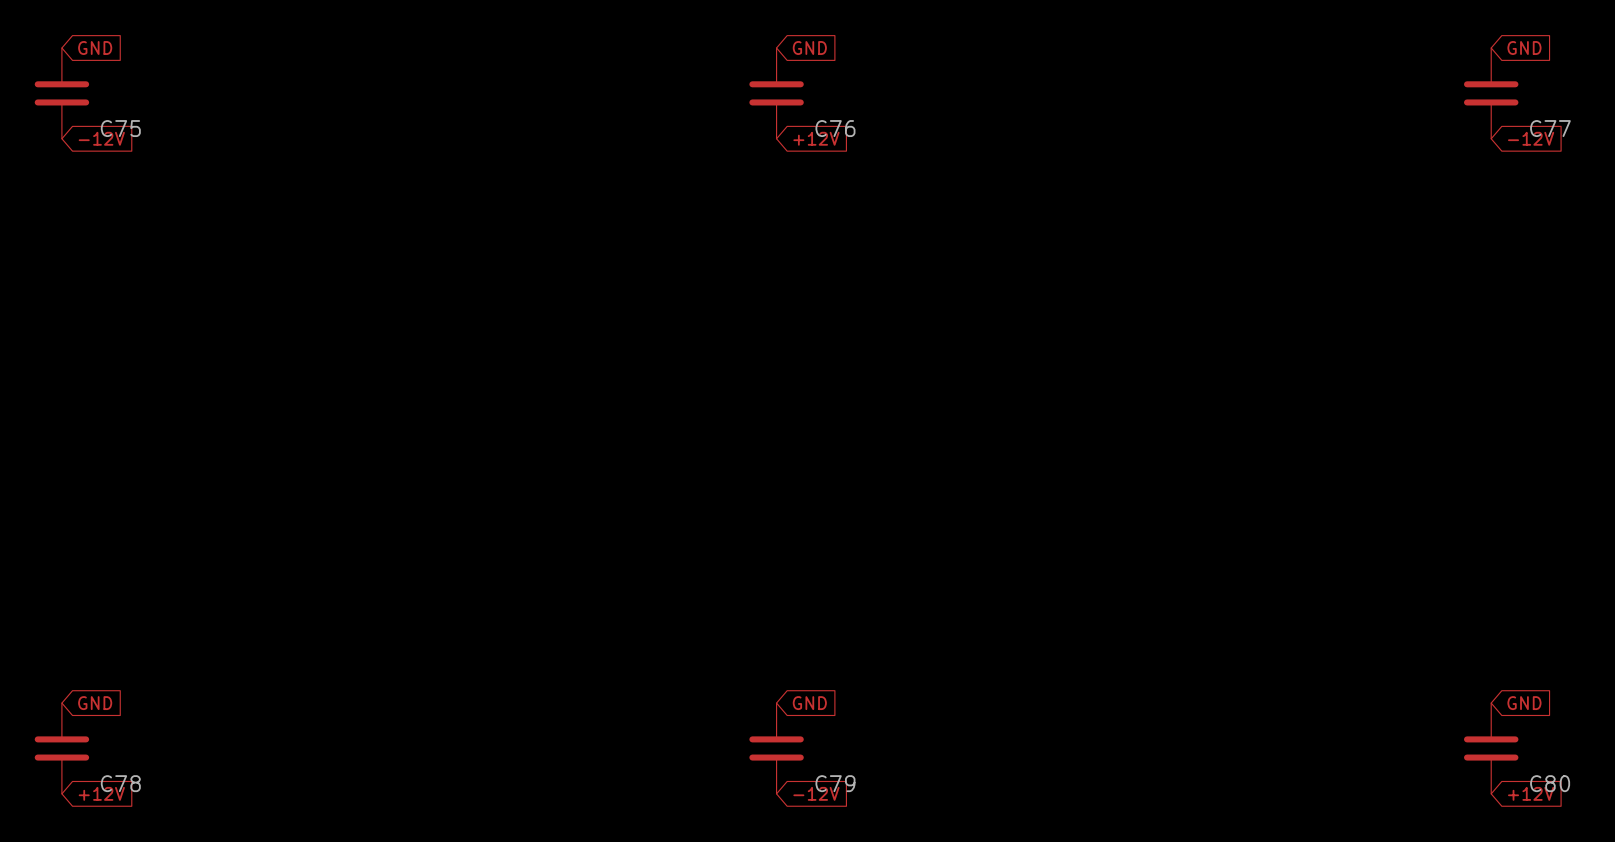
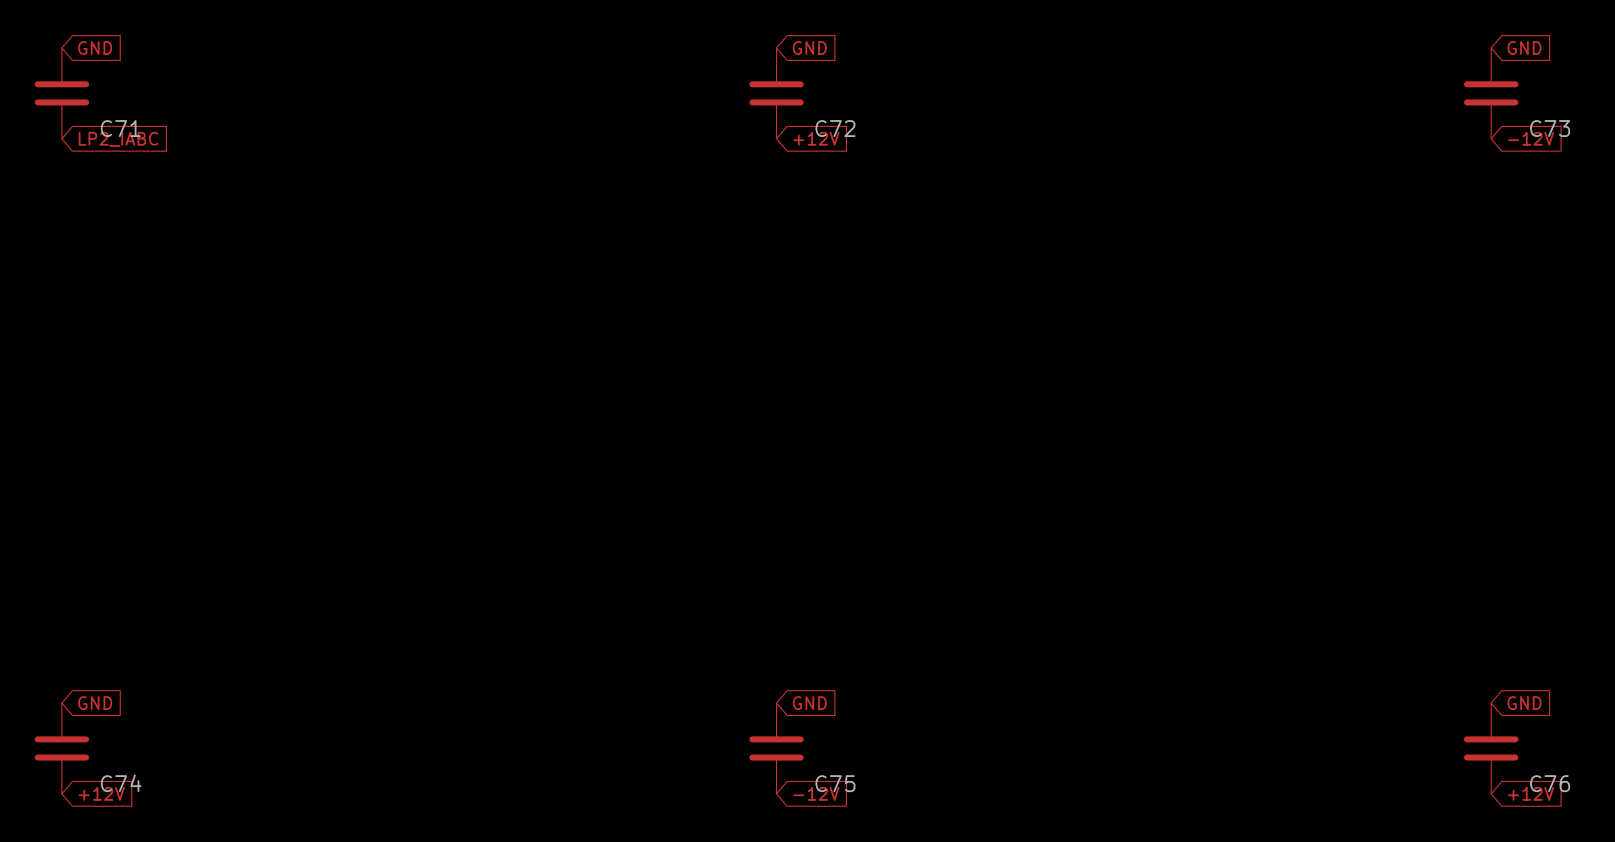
C75 name: C75 (120, 128) -> C71 (120, 128)
C76 name: C76 (835, 128) -> C72 (835, 128)
C77 name: C77 (1550, 128) -> C73 (1550, 128)
global label: -12V (101, 138) -> LP2_IABC (118, 139)
C78 name: C78 (120, 783) -> C74 (121, 783)
C79 name: C79 (835, 783) -> C75 (835, 783)
C80 name: C80 (1550, 783) -> C76 (1550, 783)

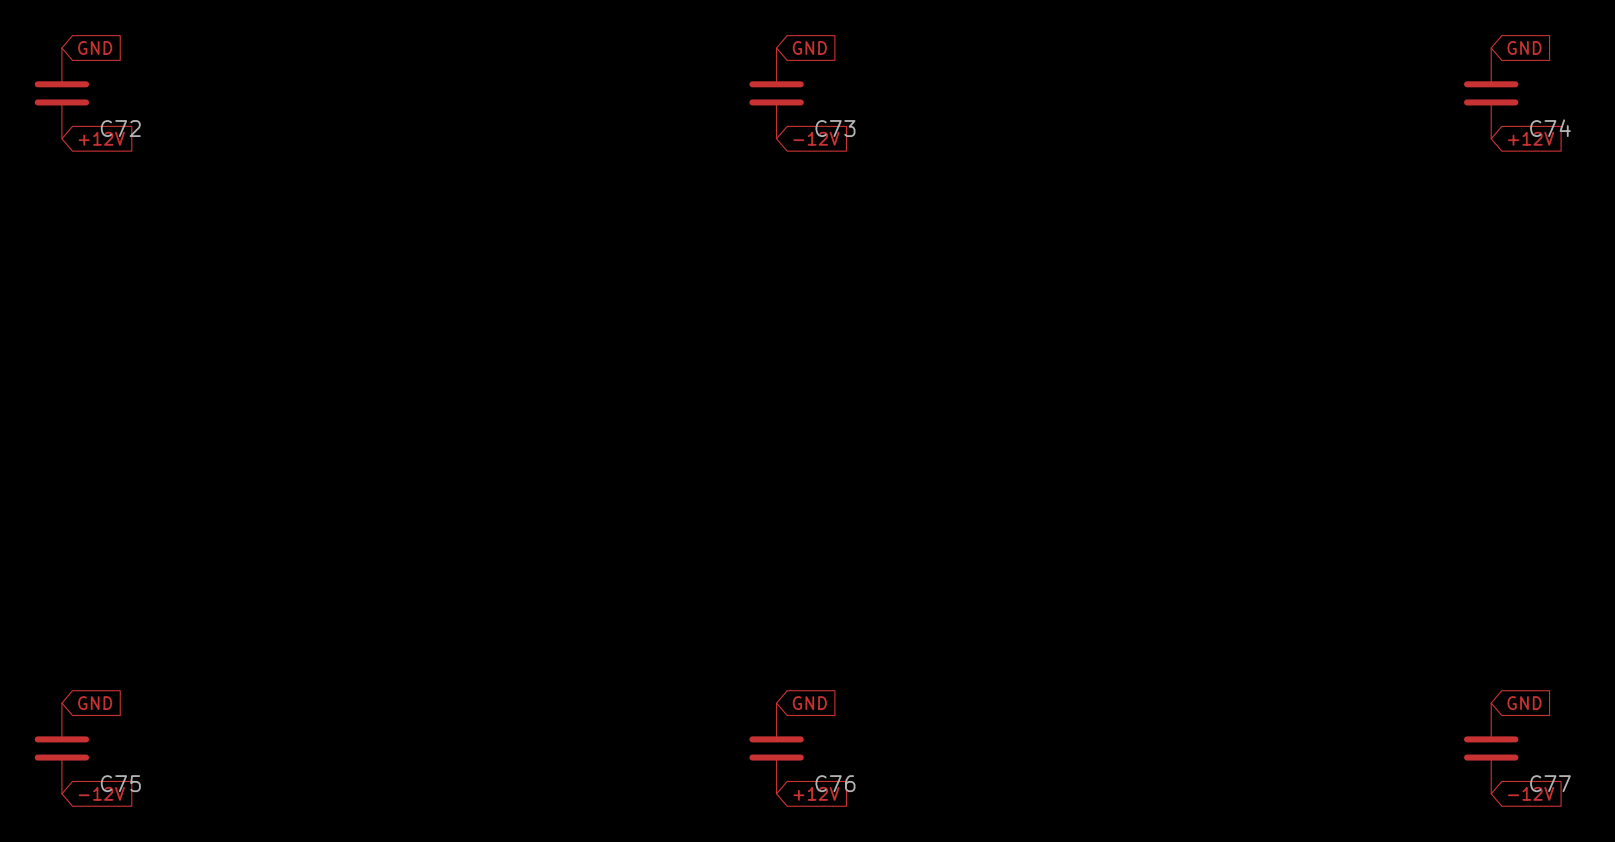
C71 name: C71 (120, 128) -> C72 (120, 128)
C72 name: C72 (835, 128) -> C73 (835, 128)
C73 name: C73 (1550, 128) -> C74 (1550, 128)
global label: +12V (816, 138) -> -12V (816, 138)
global label: -12V (1531, 138) -> +12V (1531, 138)
global label: LP2_IABC (118, 139) -> +12V (101, 138)
C74 name: C74 (121, 783) -> C75 (120, 783)
C75 name: C75 (835, 783) -> C76 (835, 783)
C76 name: C76 (1550, 783) -> C77 (1550, 783)
global label: +12V (101, 793) -> -12V (101, 793)
global label: -12V (816, 793) -> +12V (816, 793)
global label: +12V (1531, 793) -> -12V (1531, 793)

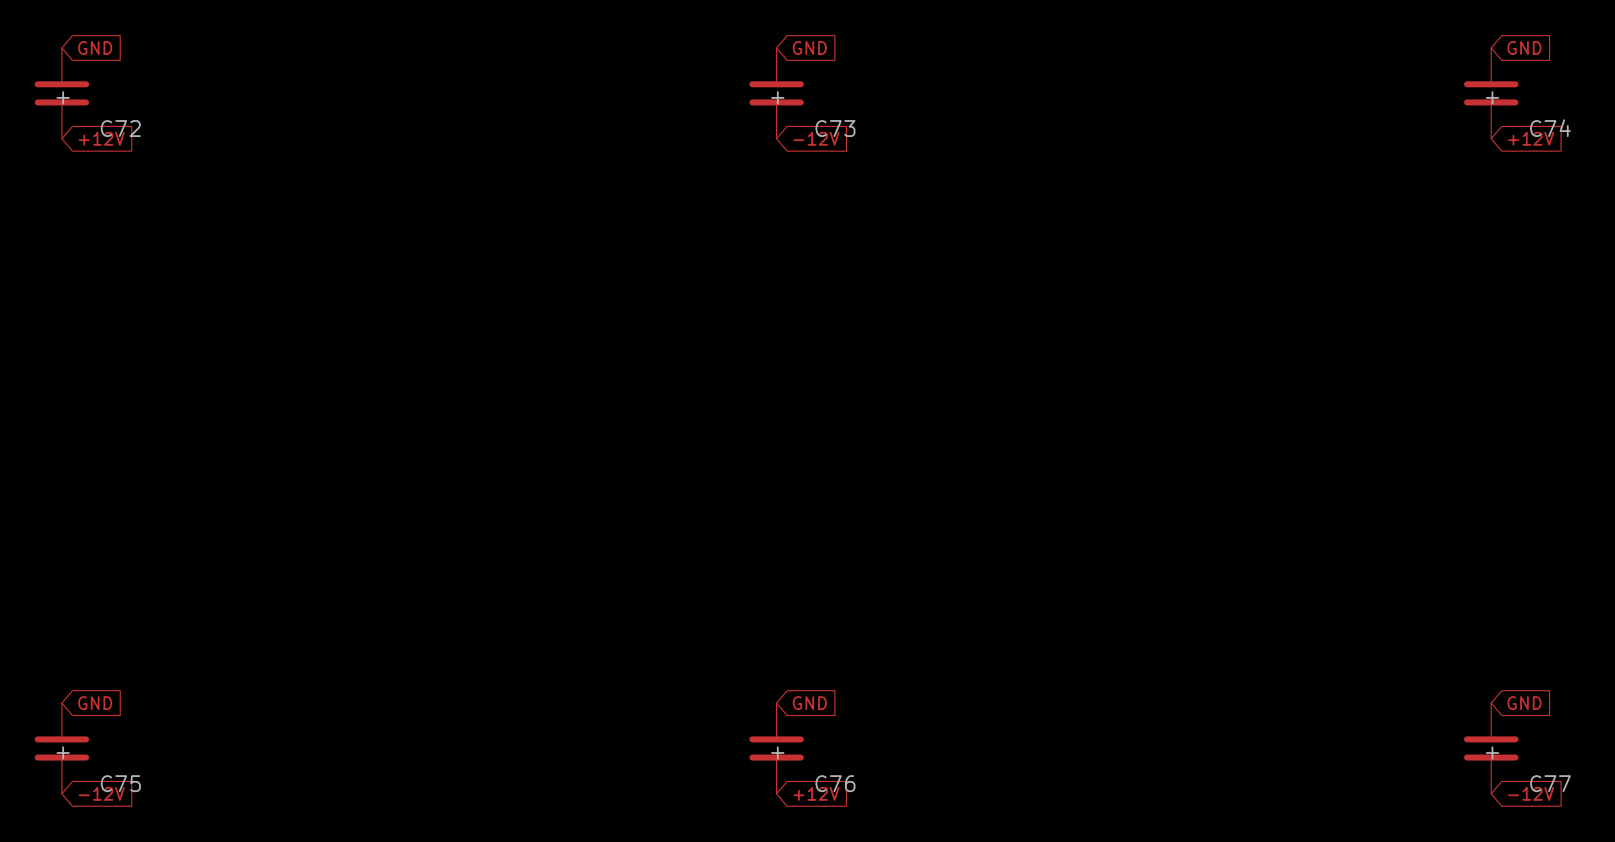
C72 pin name: none -> + (63, 97)
C73 pin name: none -> + (777, 97)
C74 pin name: none -> + (1492, 97)
C75 pin name: none -> + (63, 752)
C76 pin name: none -> + (777, 752)
C77 pin name: none -> + (1492, 752)

